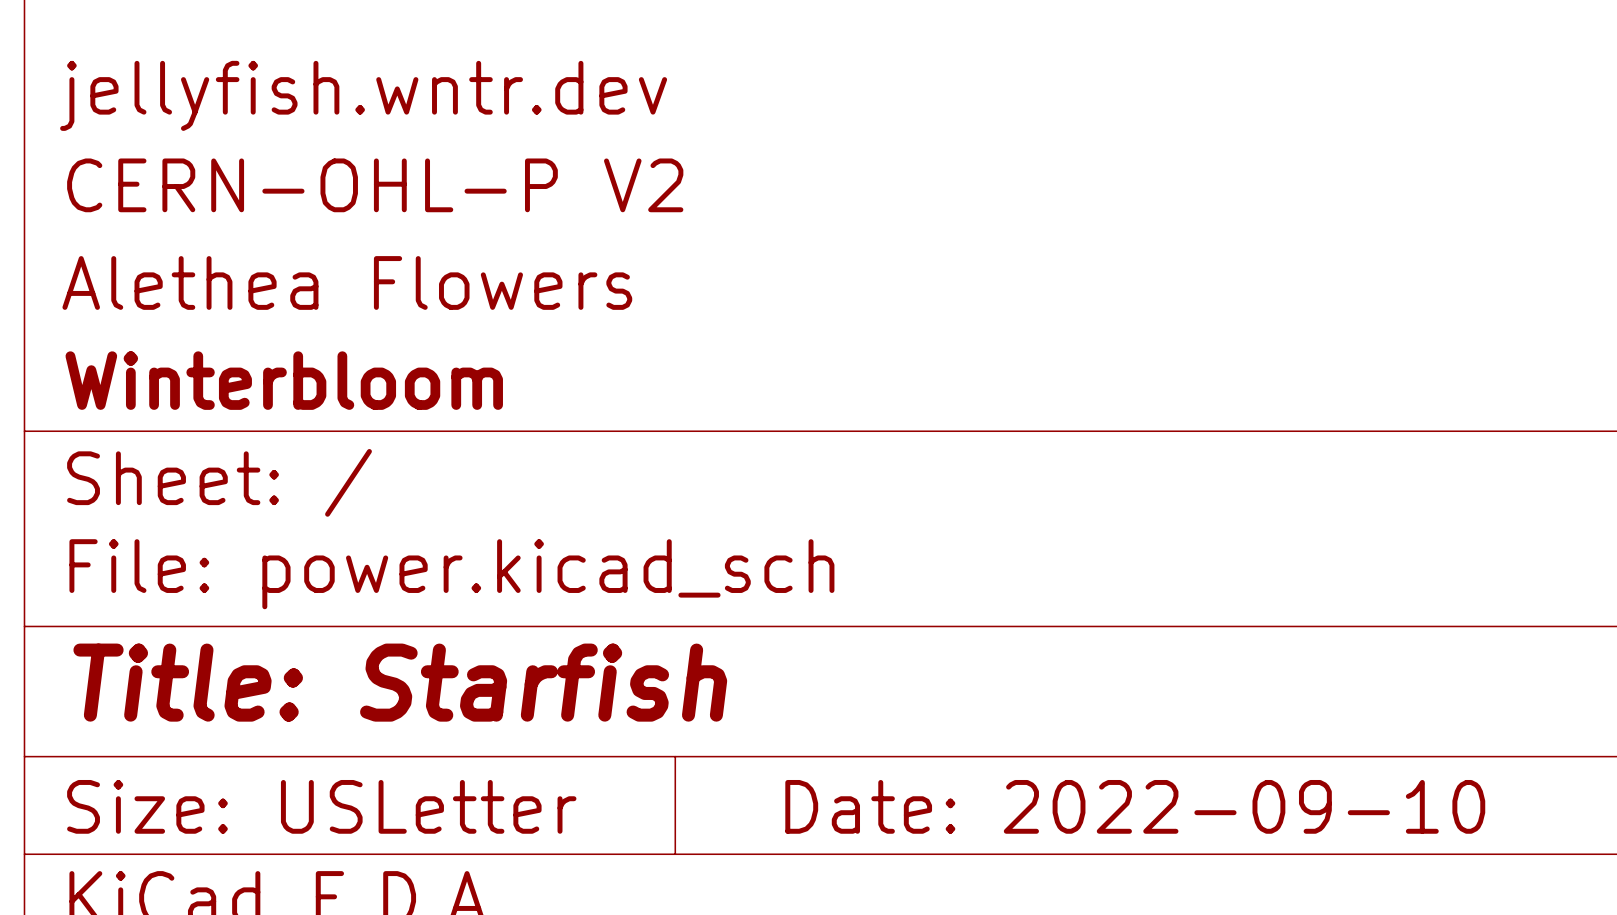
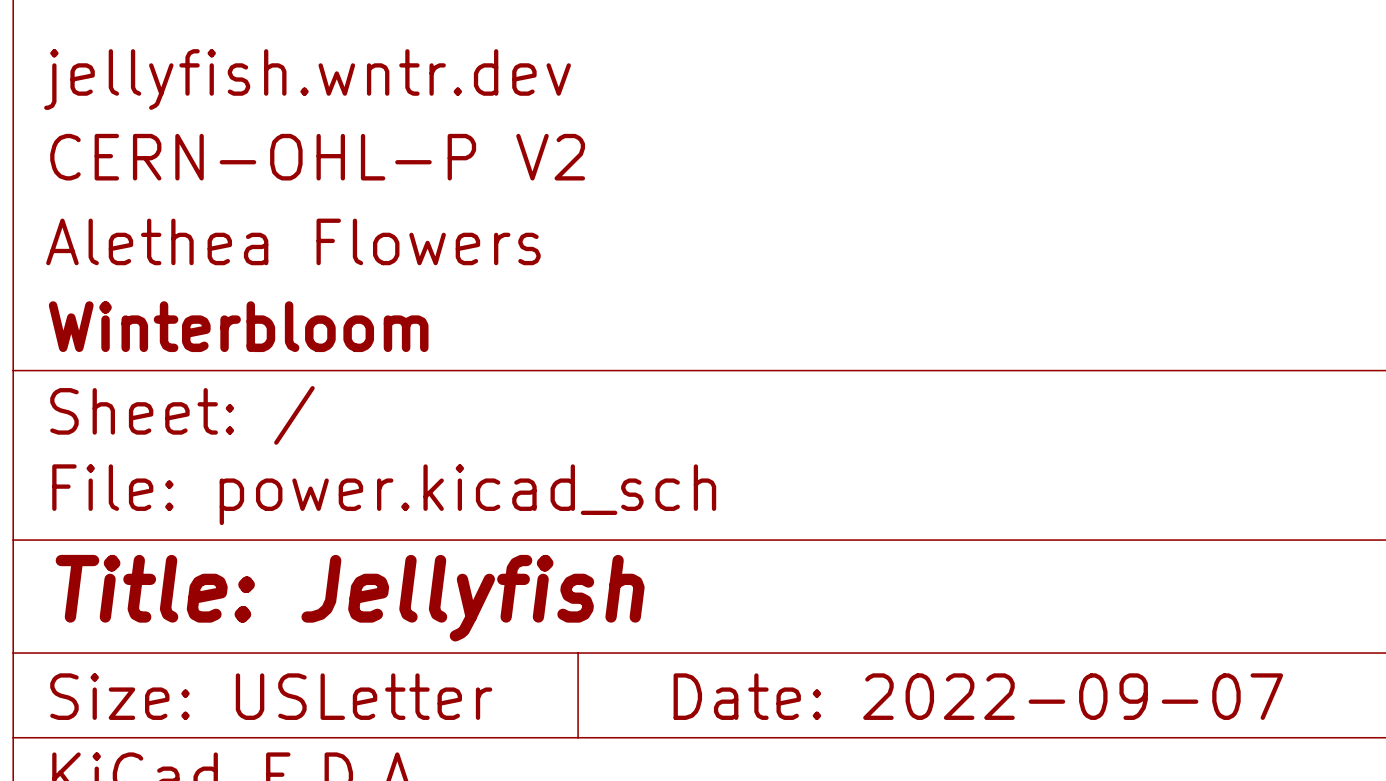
title block: Title: Starfish (400, 682) -> Title: Jellyfish (350, 598)
title block: Date: 2022-09-10 (1135, 806) -> Date: 2022-09-07 (978, 696)

